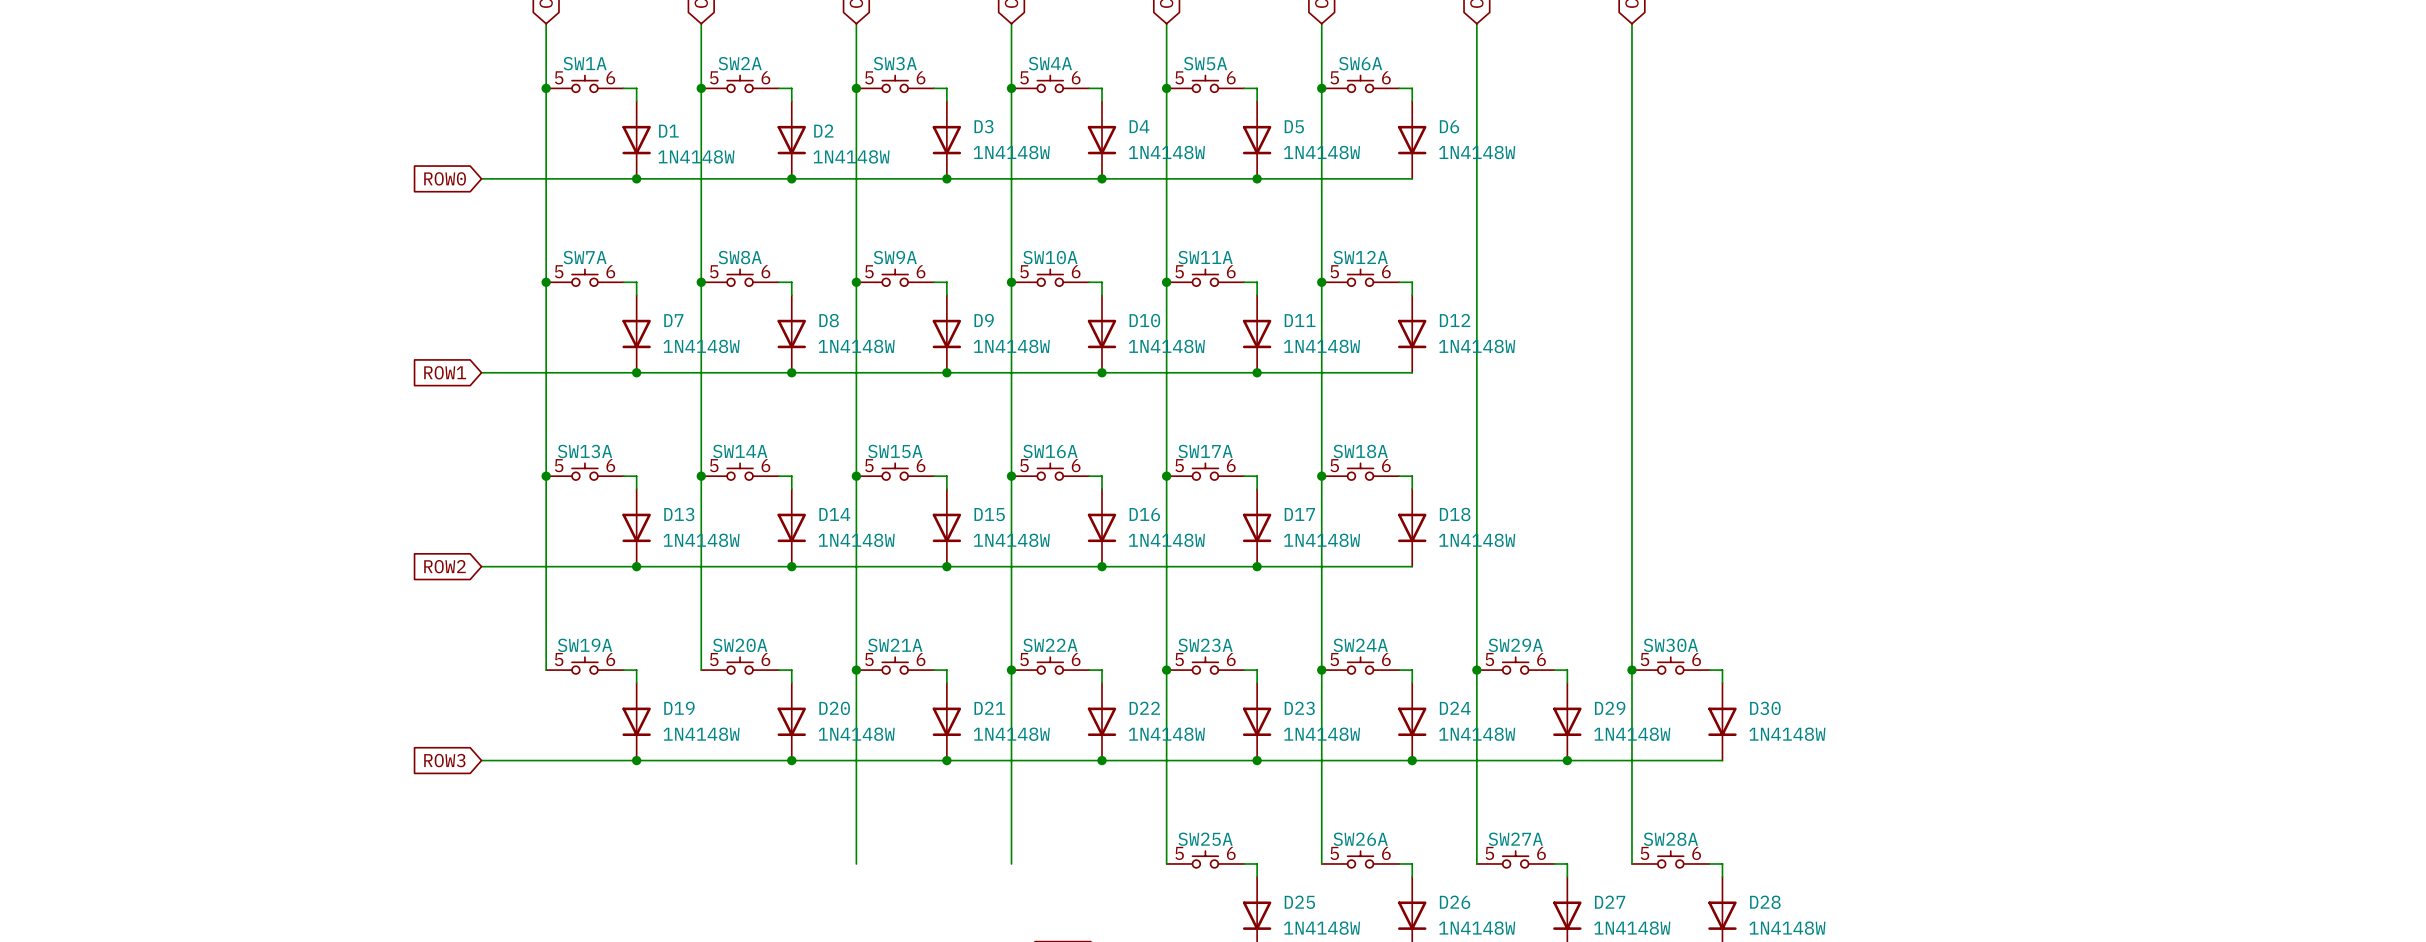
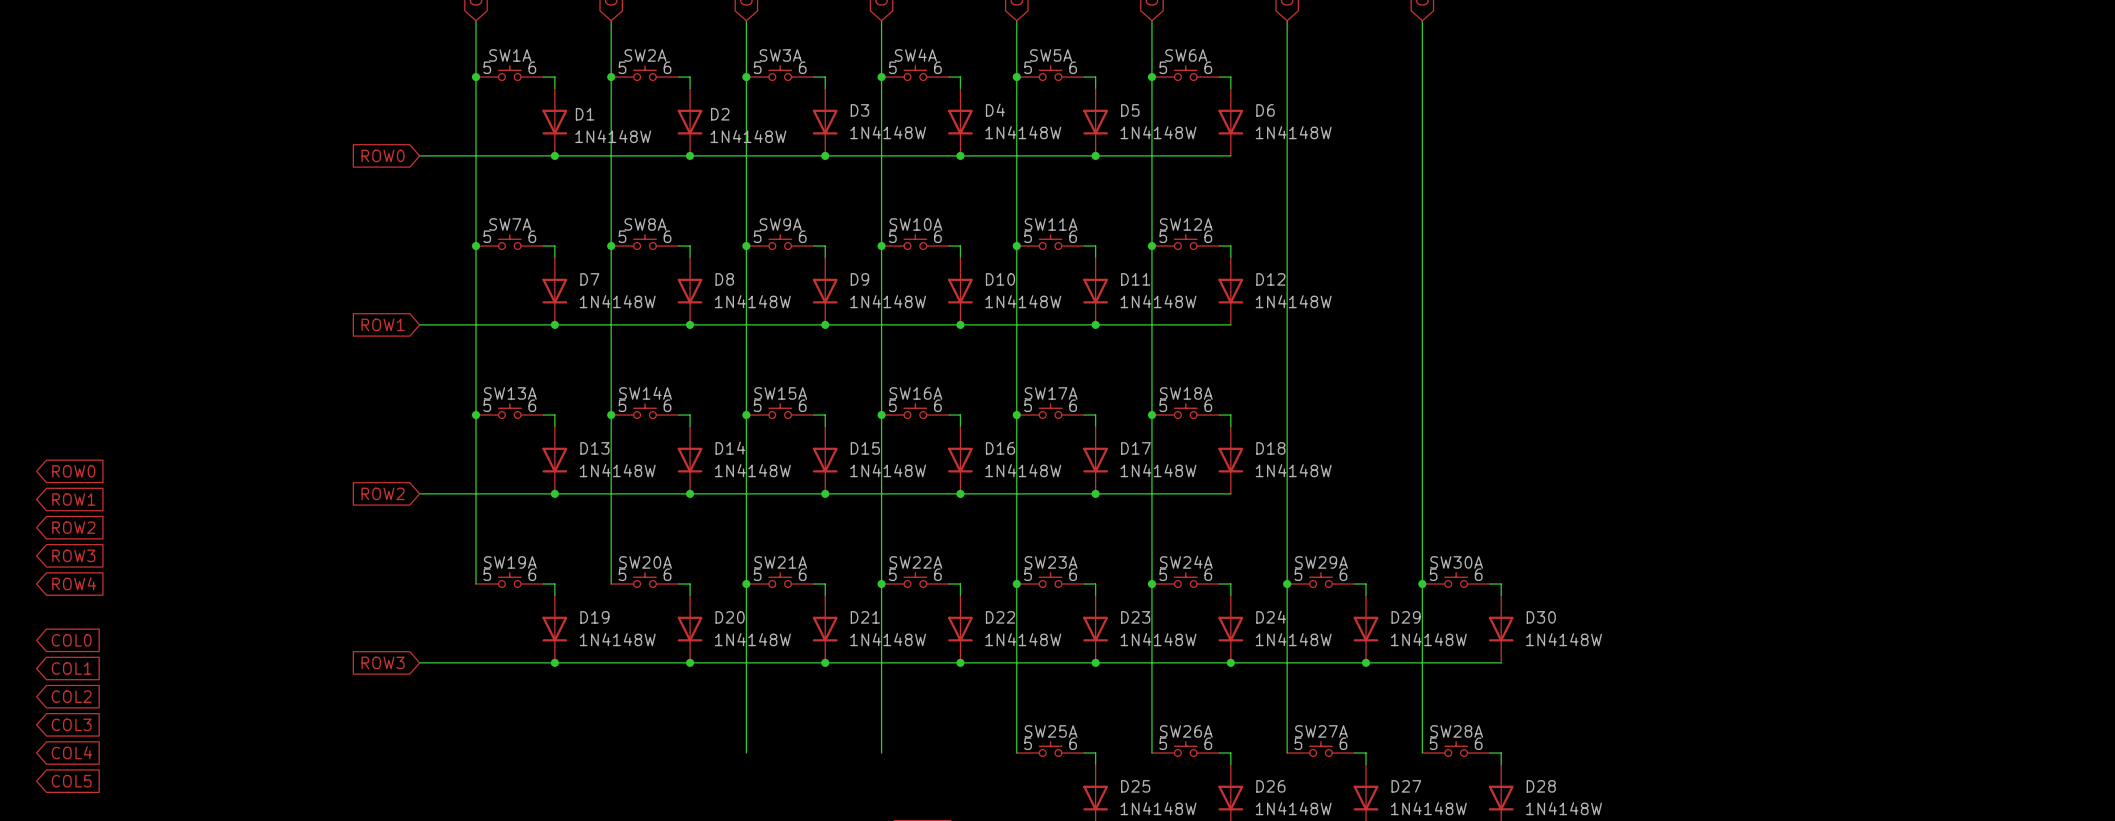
global label: none -> ROW0 (73, 471)
global label: none -> ROW1 (73, 499)
global label: none -> ROW2 (73, 527)
global label: none -> ROW3 (73, 555)
global label: none -> ROW4 (74, 583)
global label: none -> COL0 (71, 640)
global label: none -> COL1 (71, 668)
global label: none -> COL2 (71, 696)
global label: none -> COL3 (71, 724)
global label: none -> COL4 (71, 752)
global label: none -> COL5 (71, 781)

